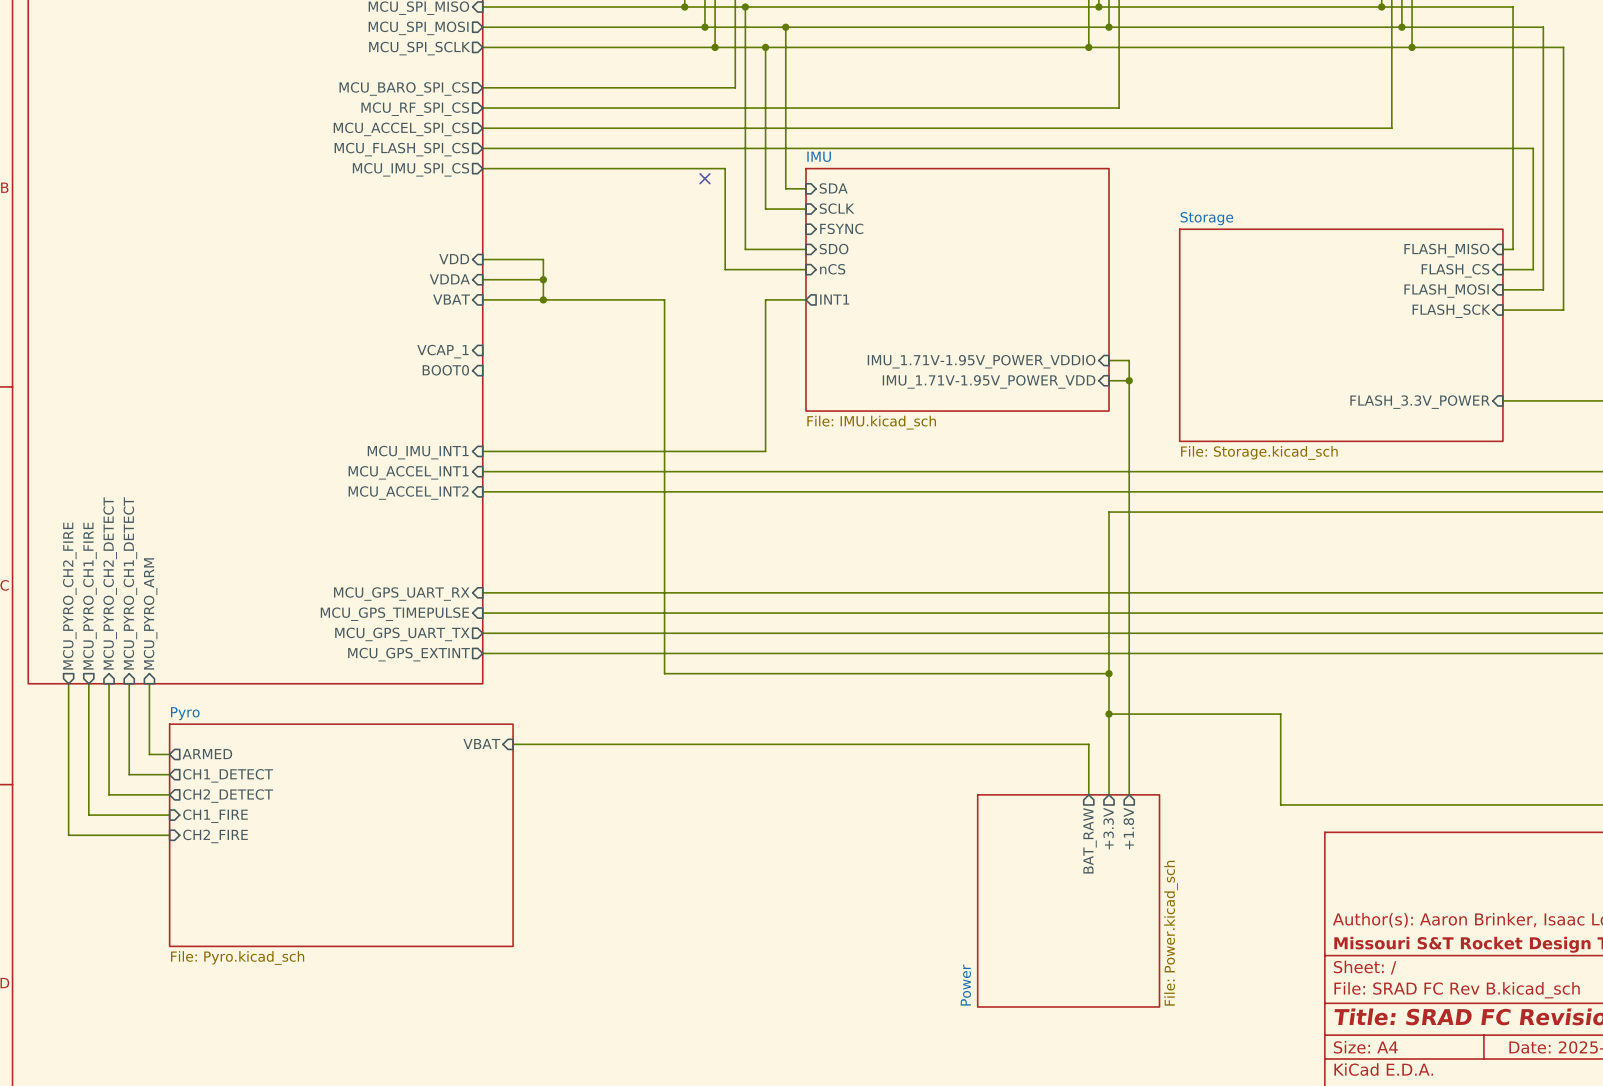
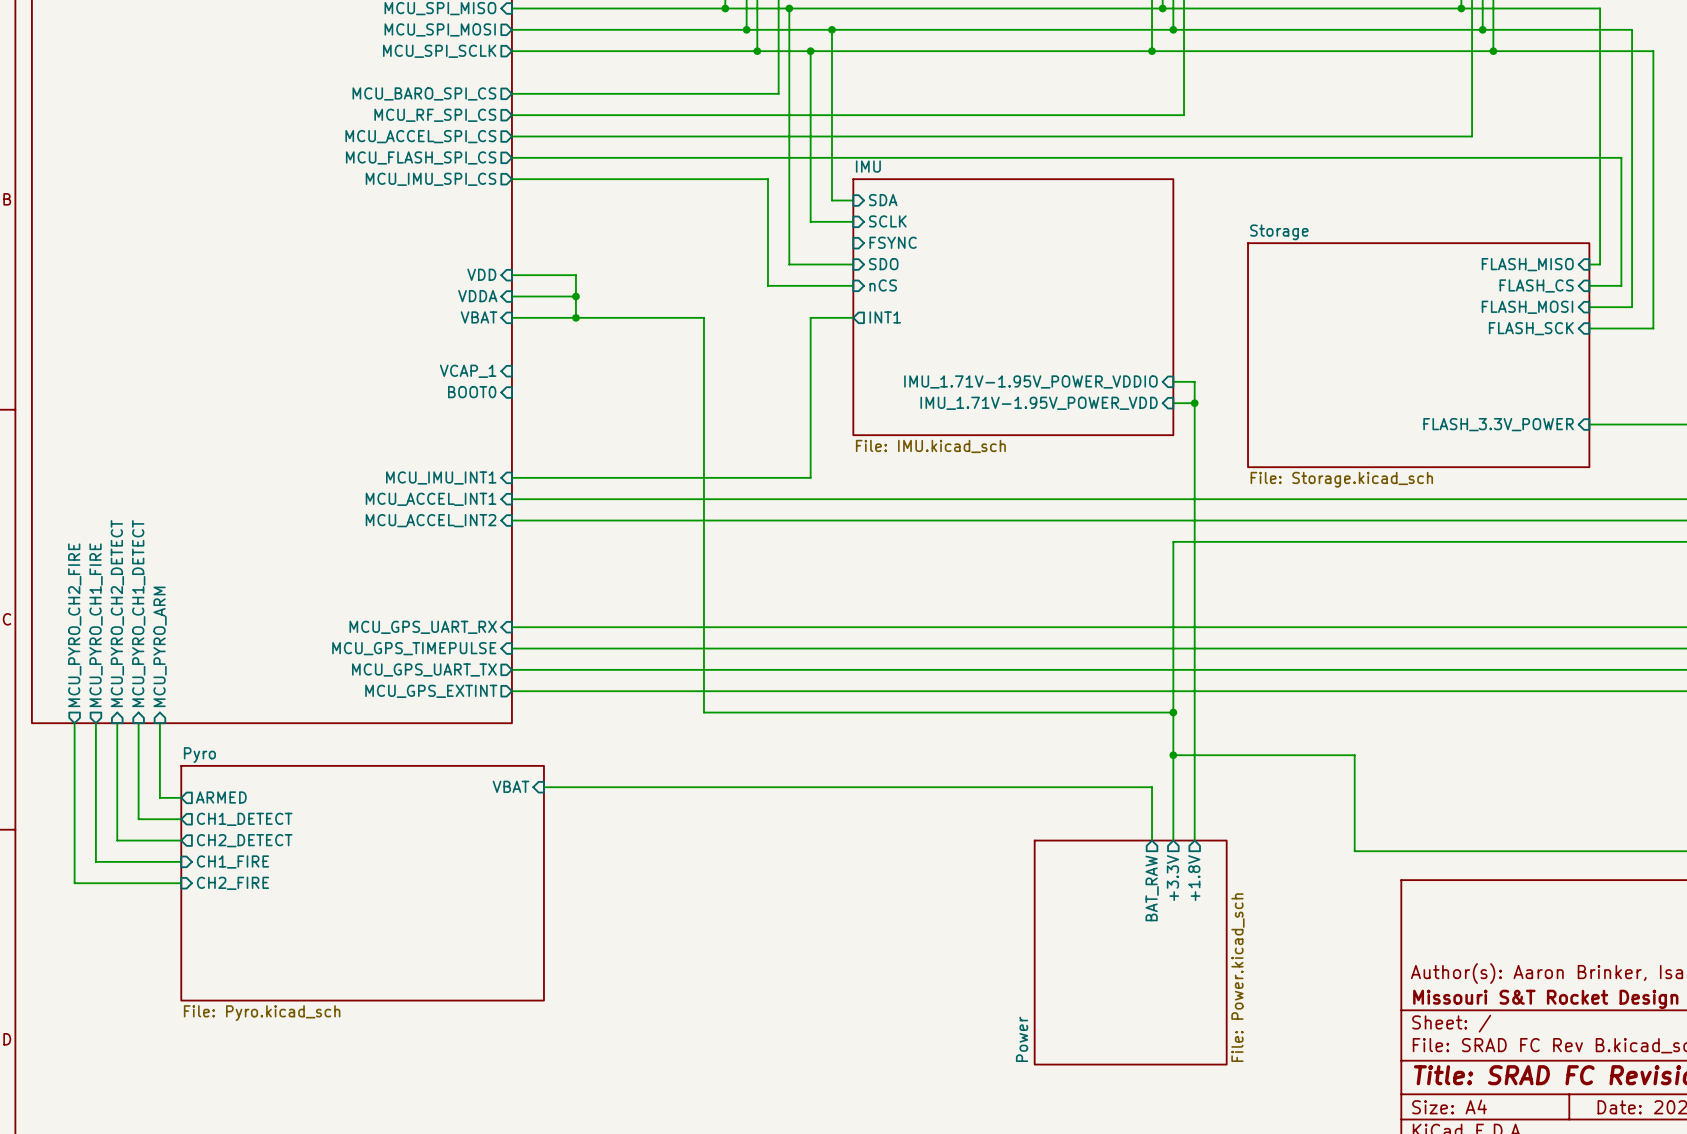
no-connect mark: (704, 178) -> none

